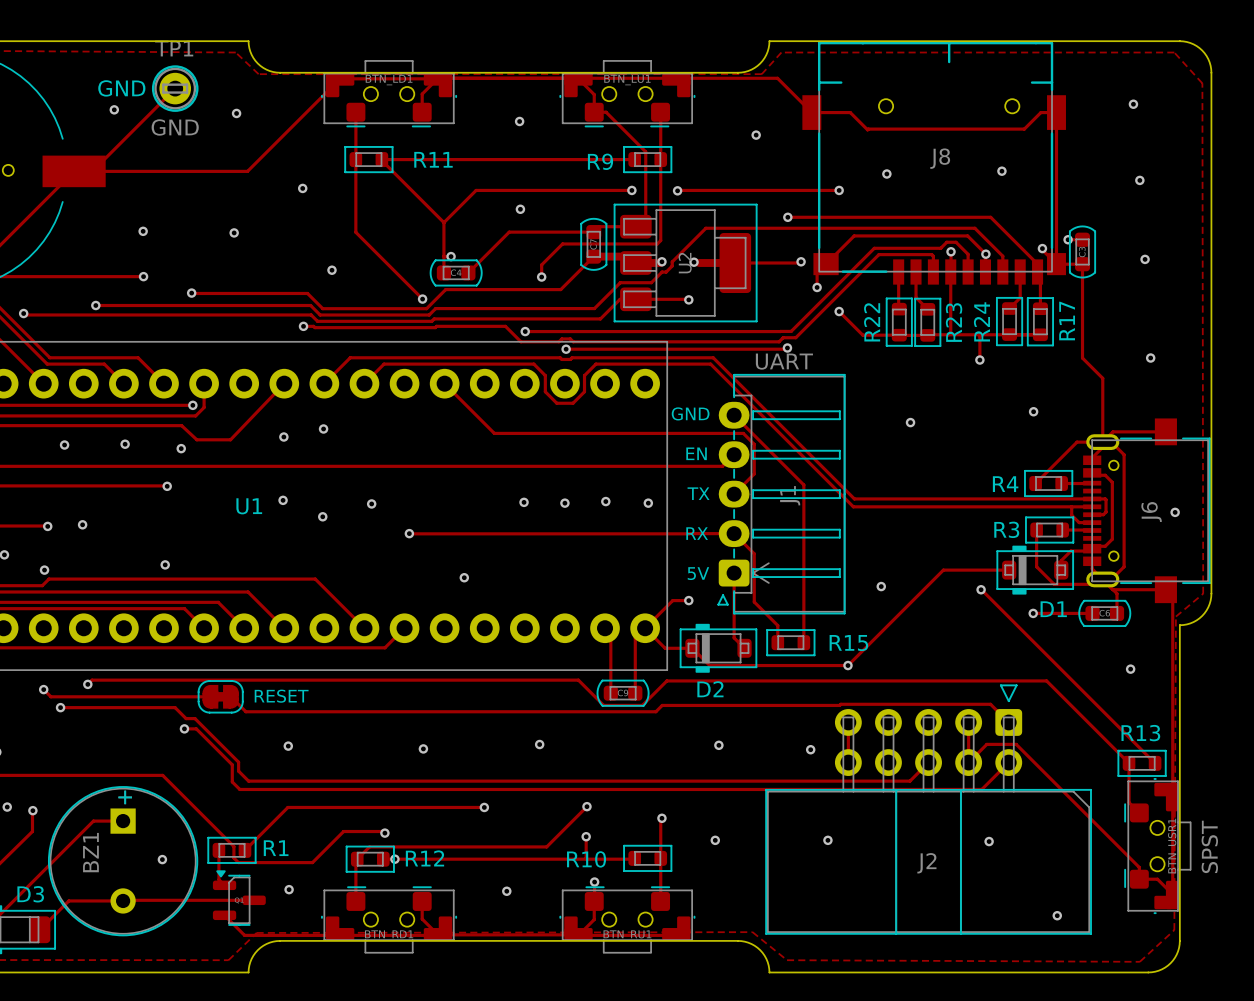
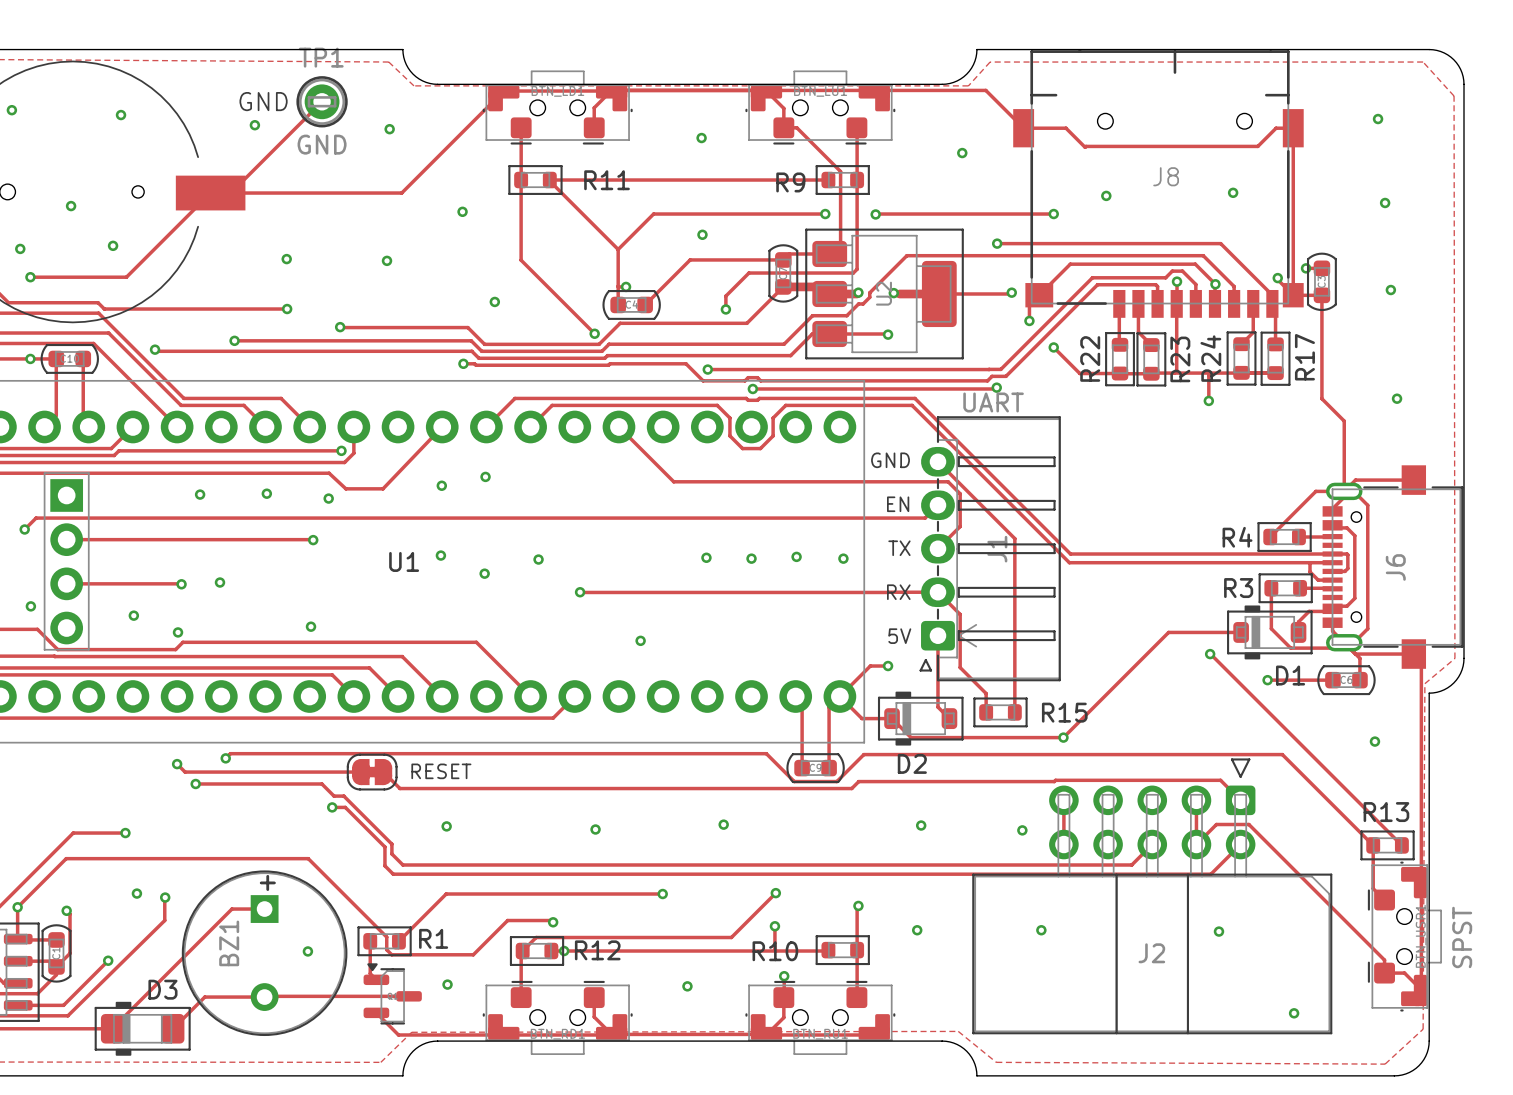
via: (1033, 411) -> none
via: (910, 422) -> none
via: (1175, 512) -> none
via: (881, 586) -> none

